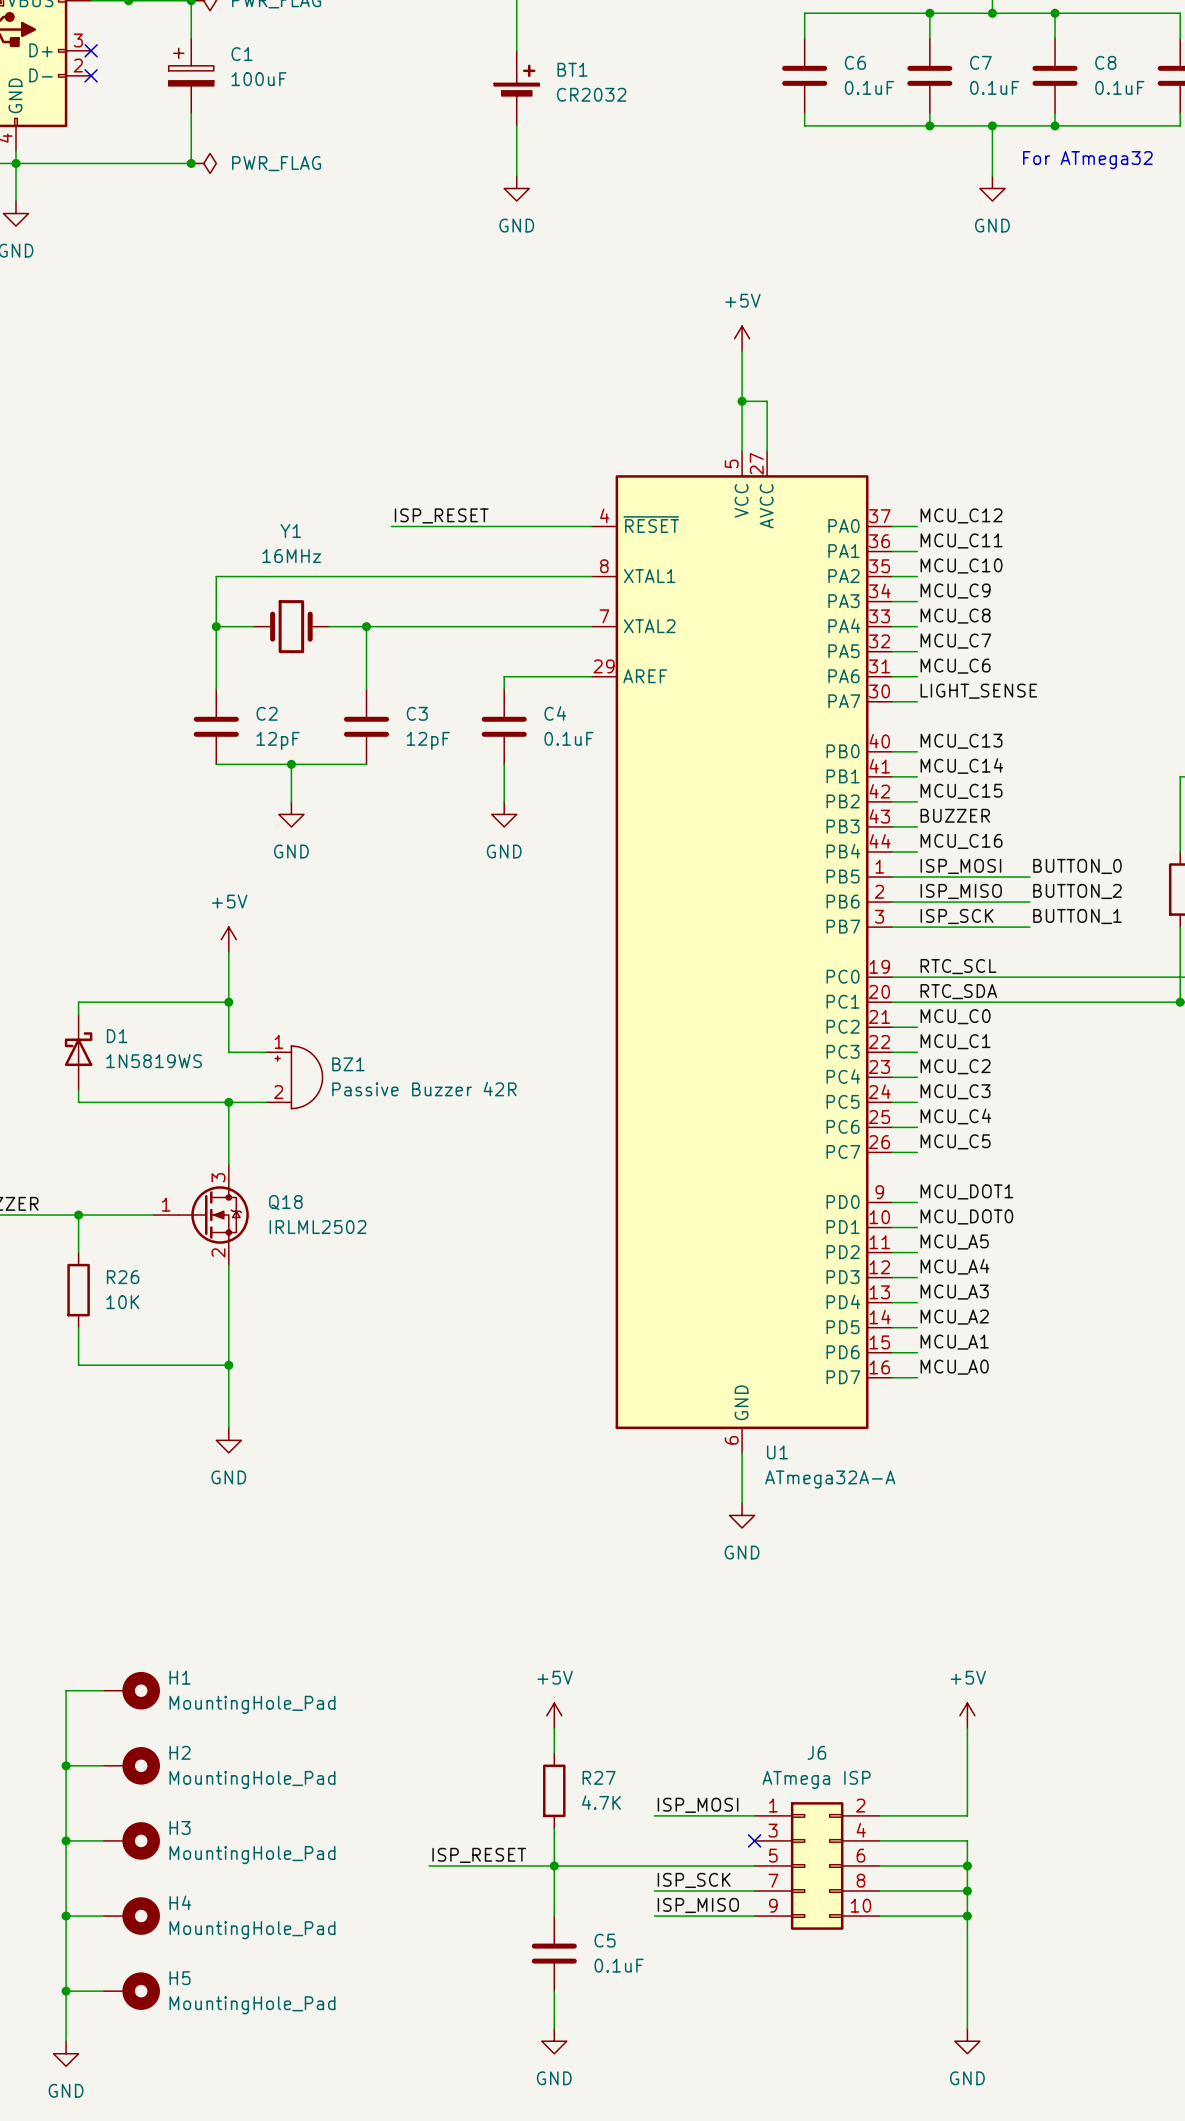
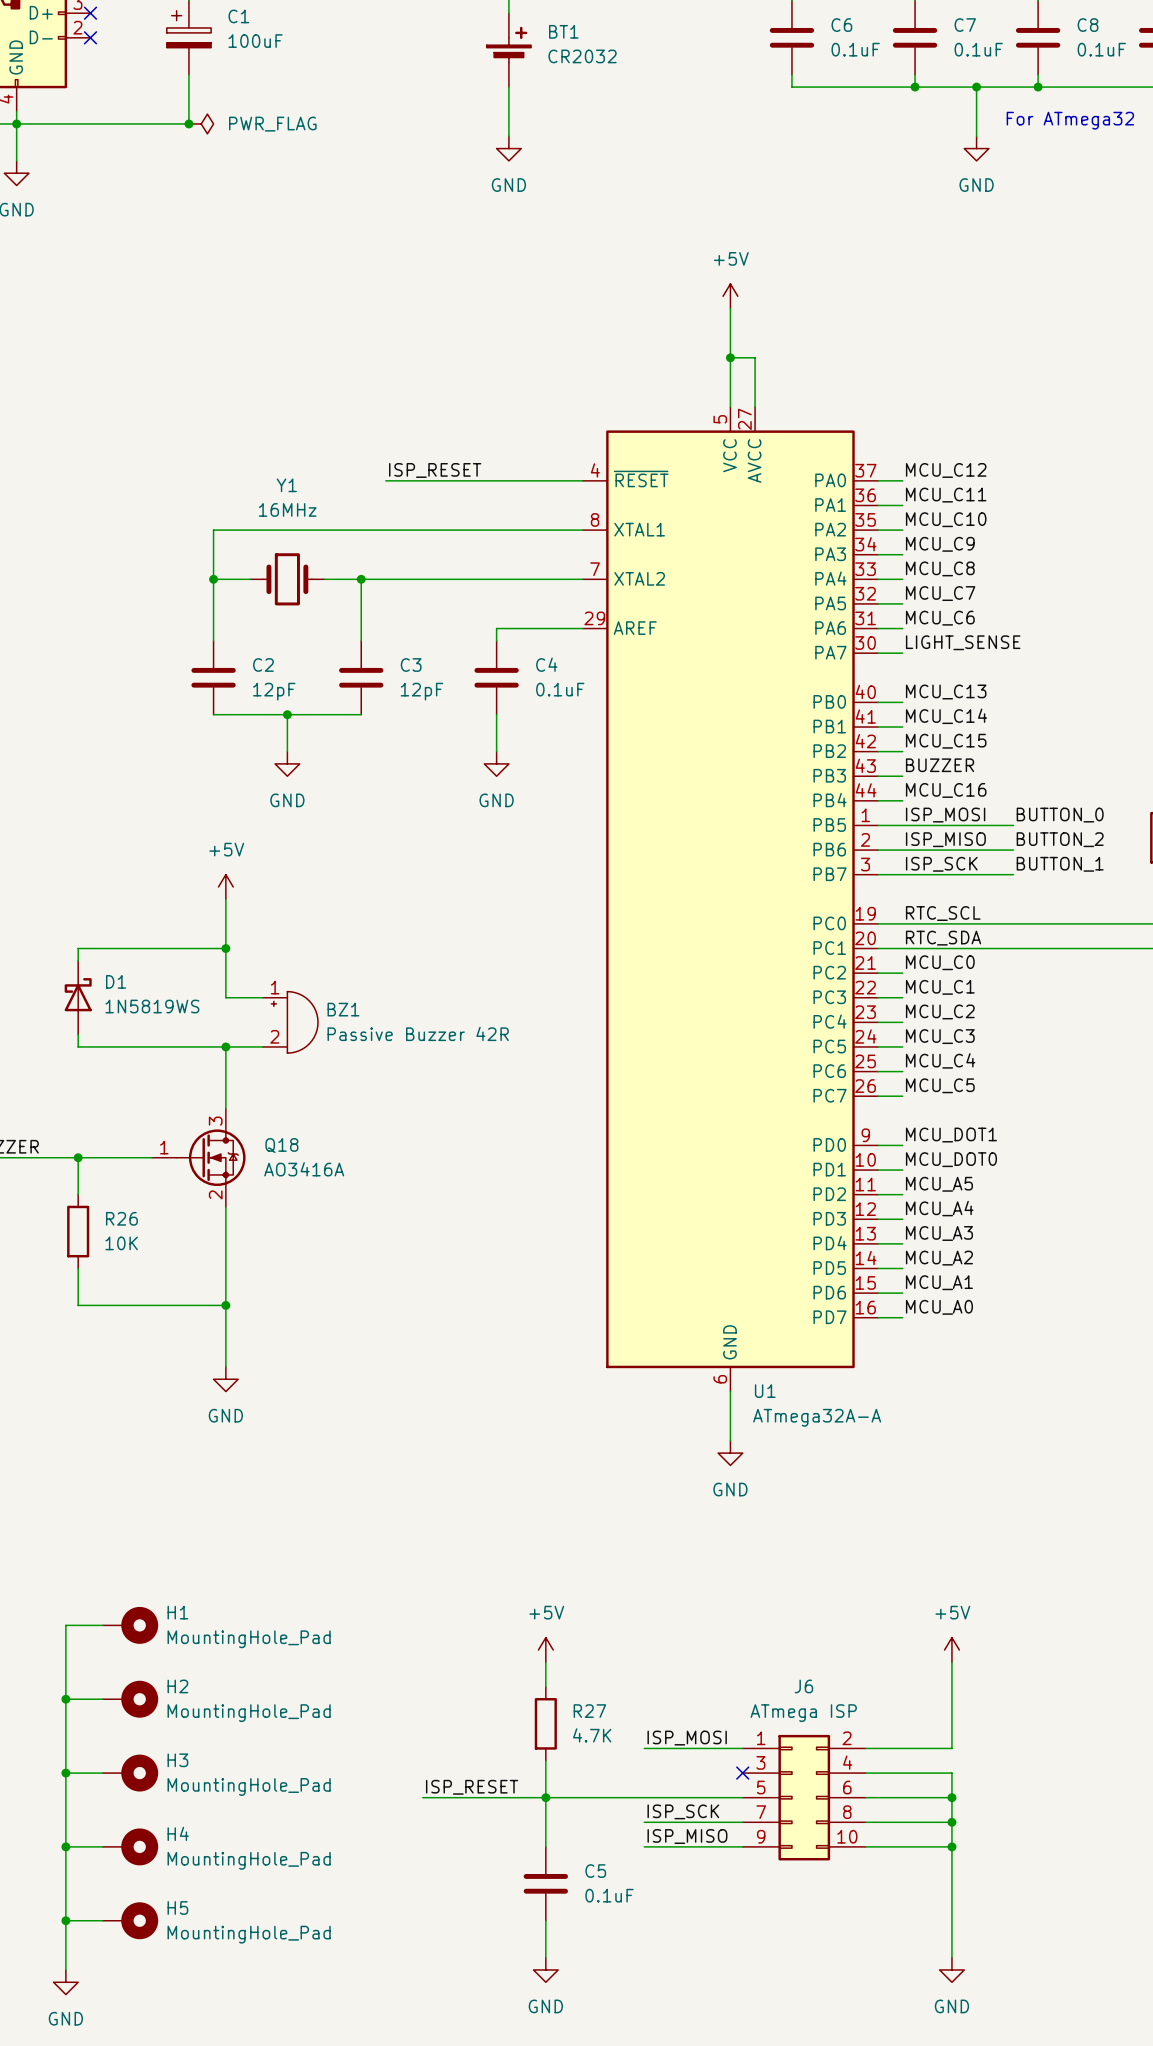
Q18 value: IRLML2502 (318, 1227) -> AO3416A (304, 1169)

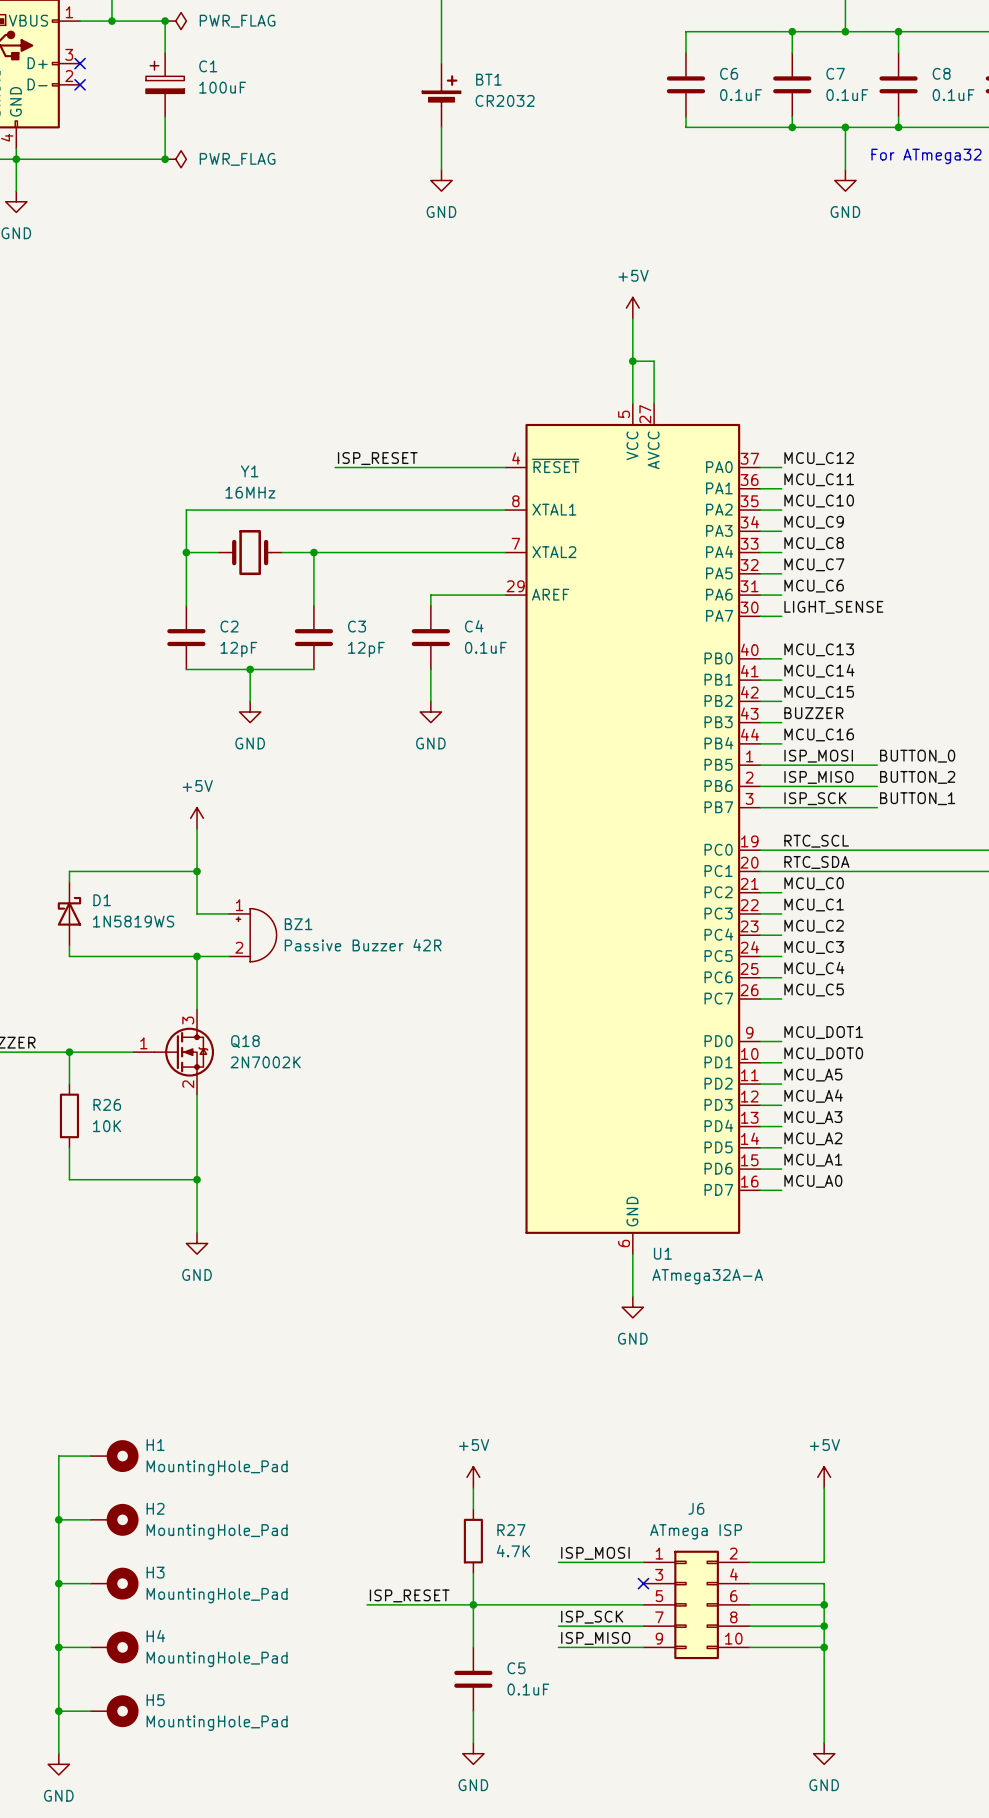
Q18 value: AO3416A (304, 1169) -> 2N7002K (265, 1062)

